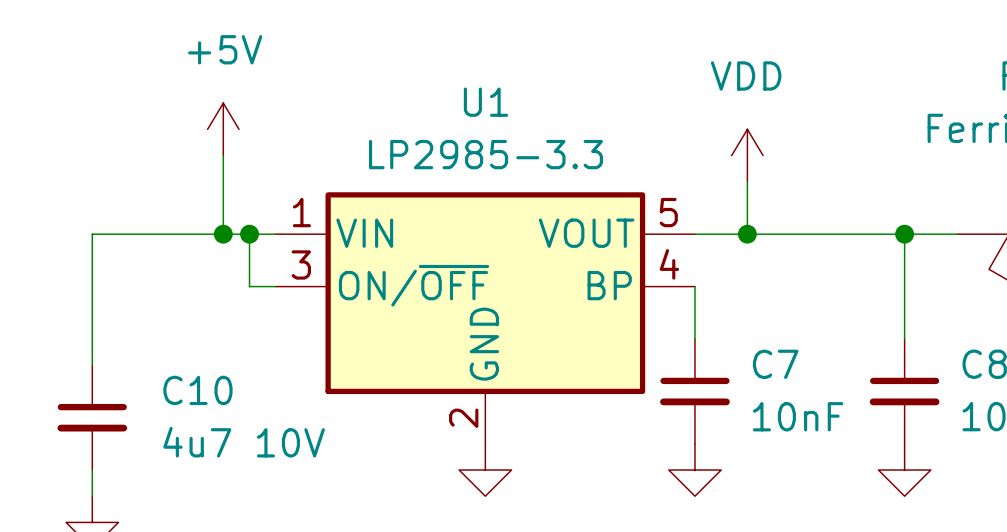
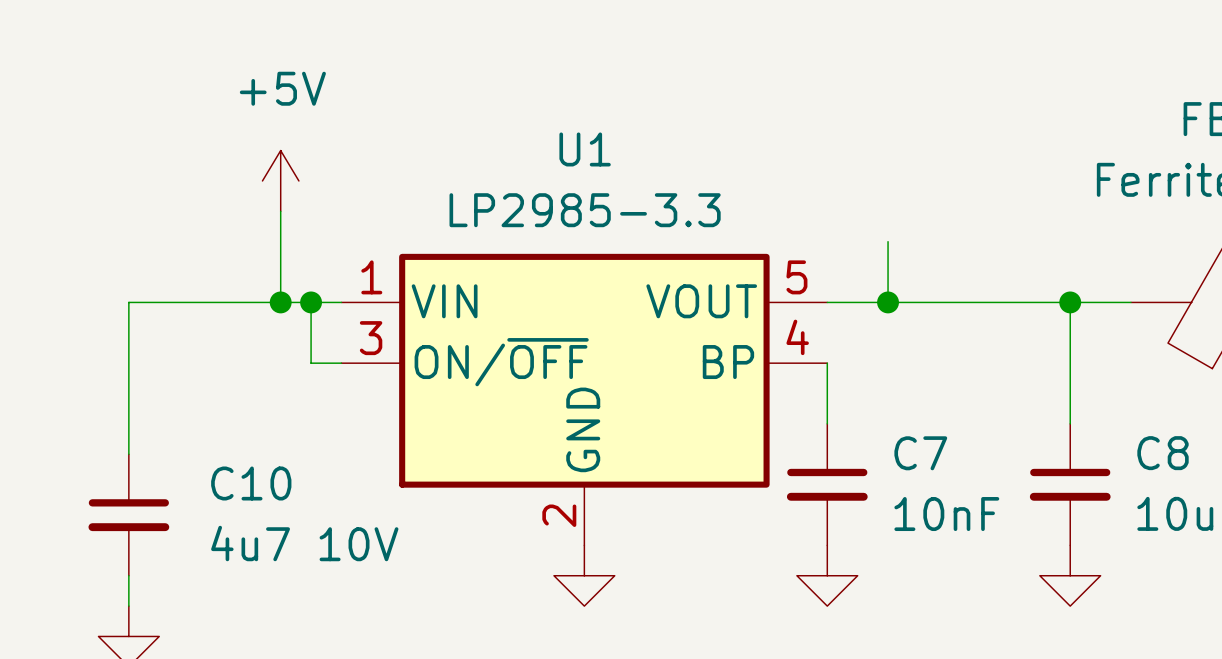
power symbol: VDD (747, 155) -> none

